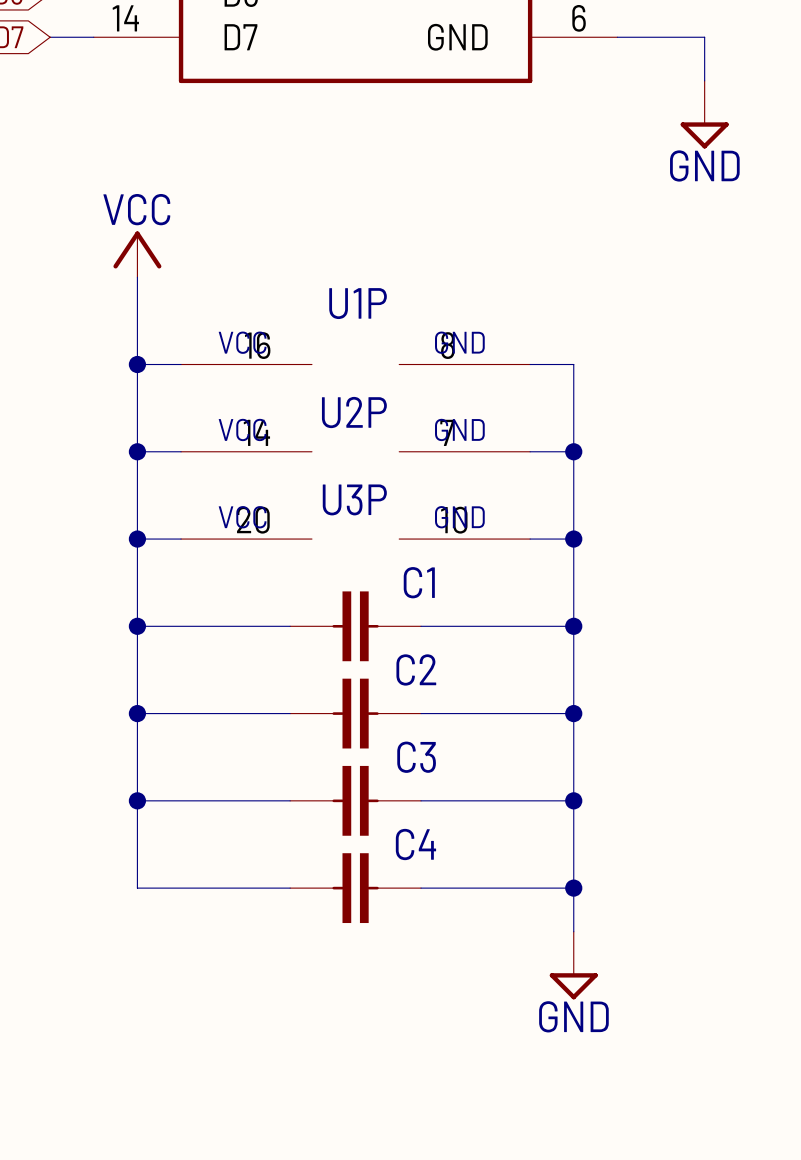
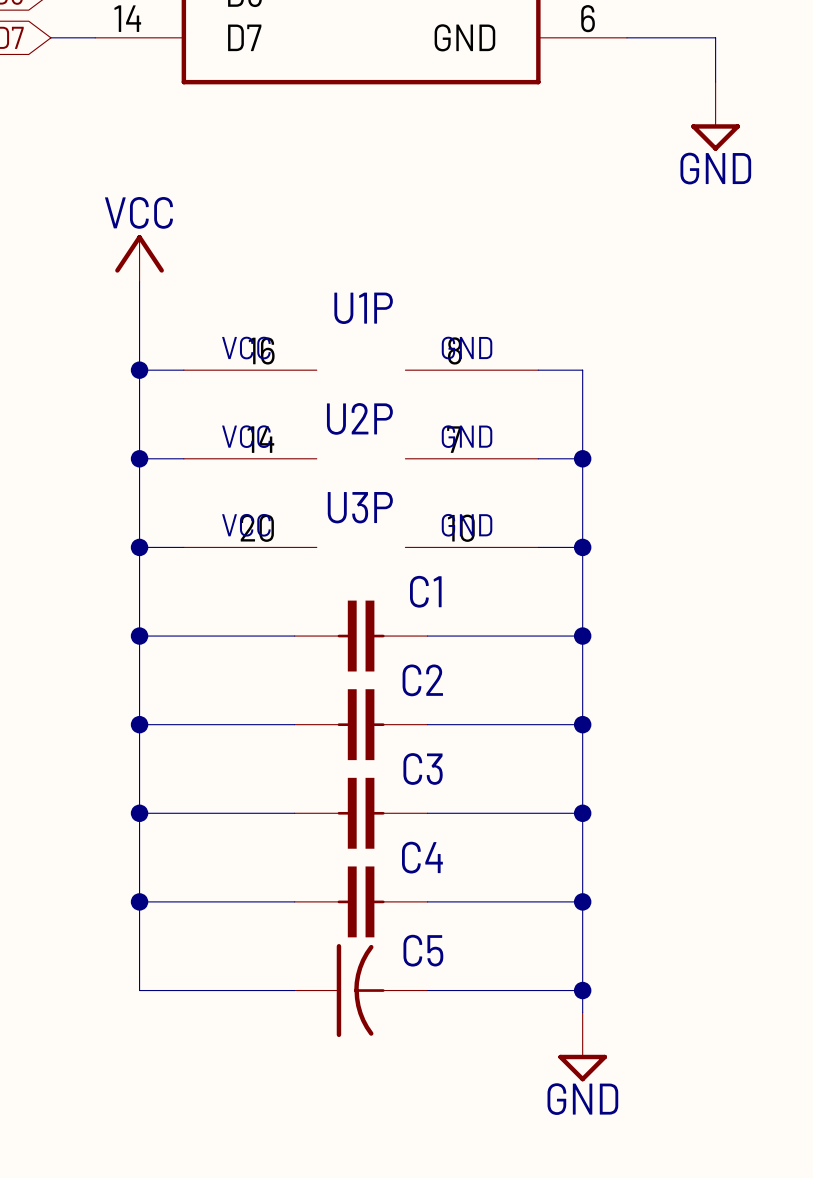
wire: none -> (139, 901) (139, 990) (294, 990)
junction: none -> (139, 901)
power symbol position: GND (573, 965) -> GND (582, 1047)
C5: none -> (361, 990)
wire: none -> (427, 990) (582, 990)
junction: none -> (582, 990)

